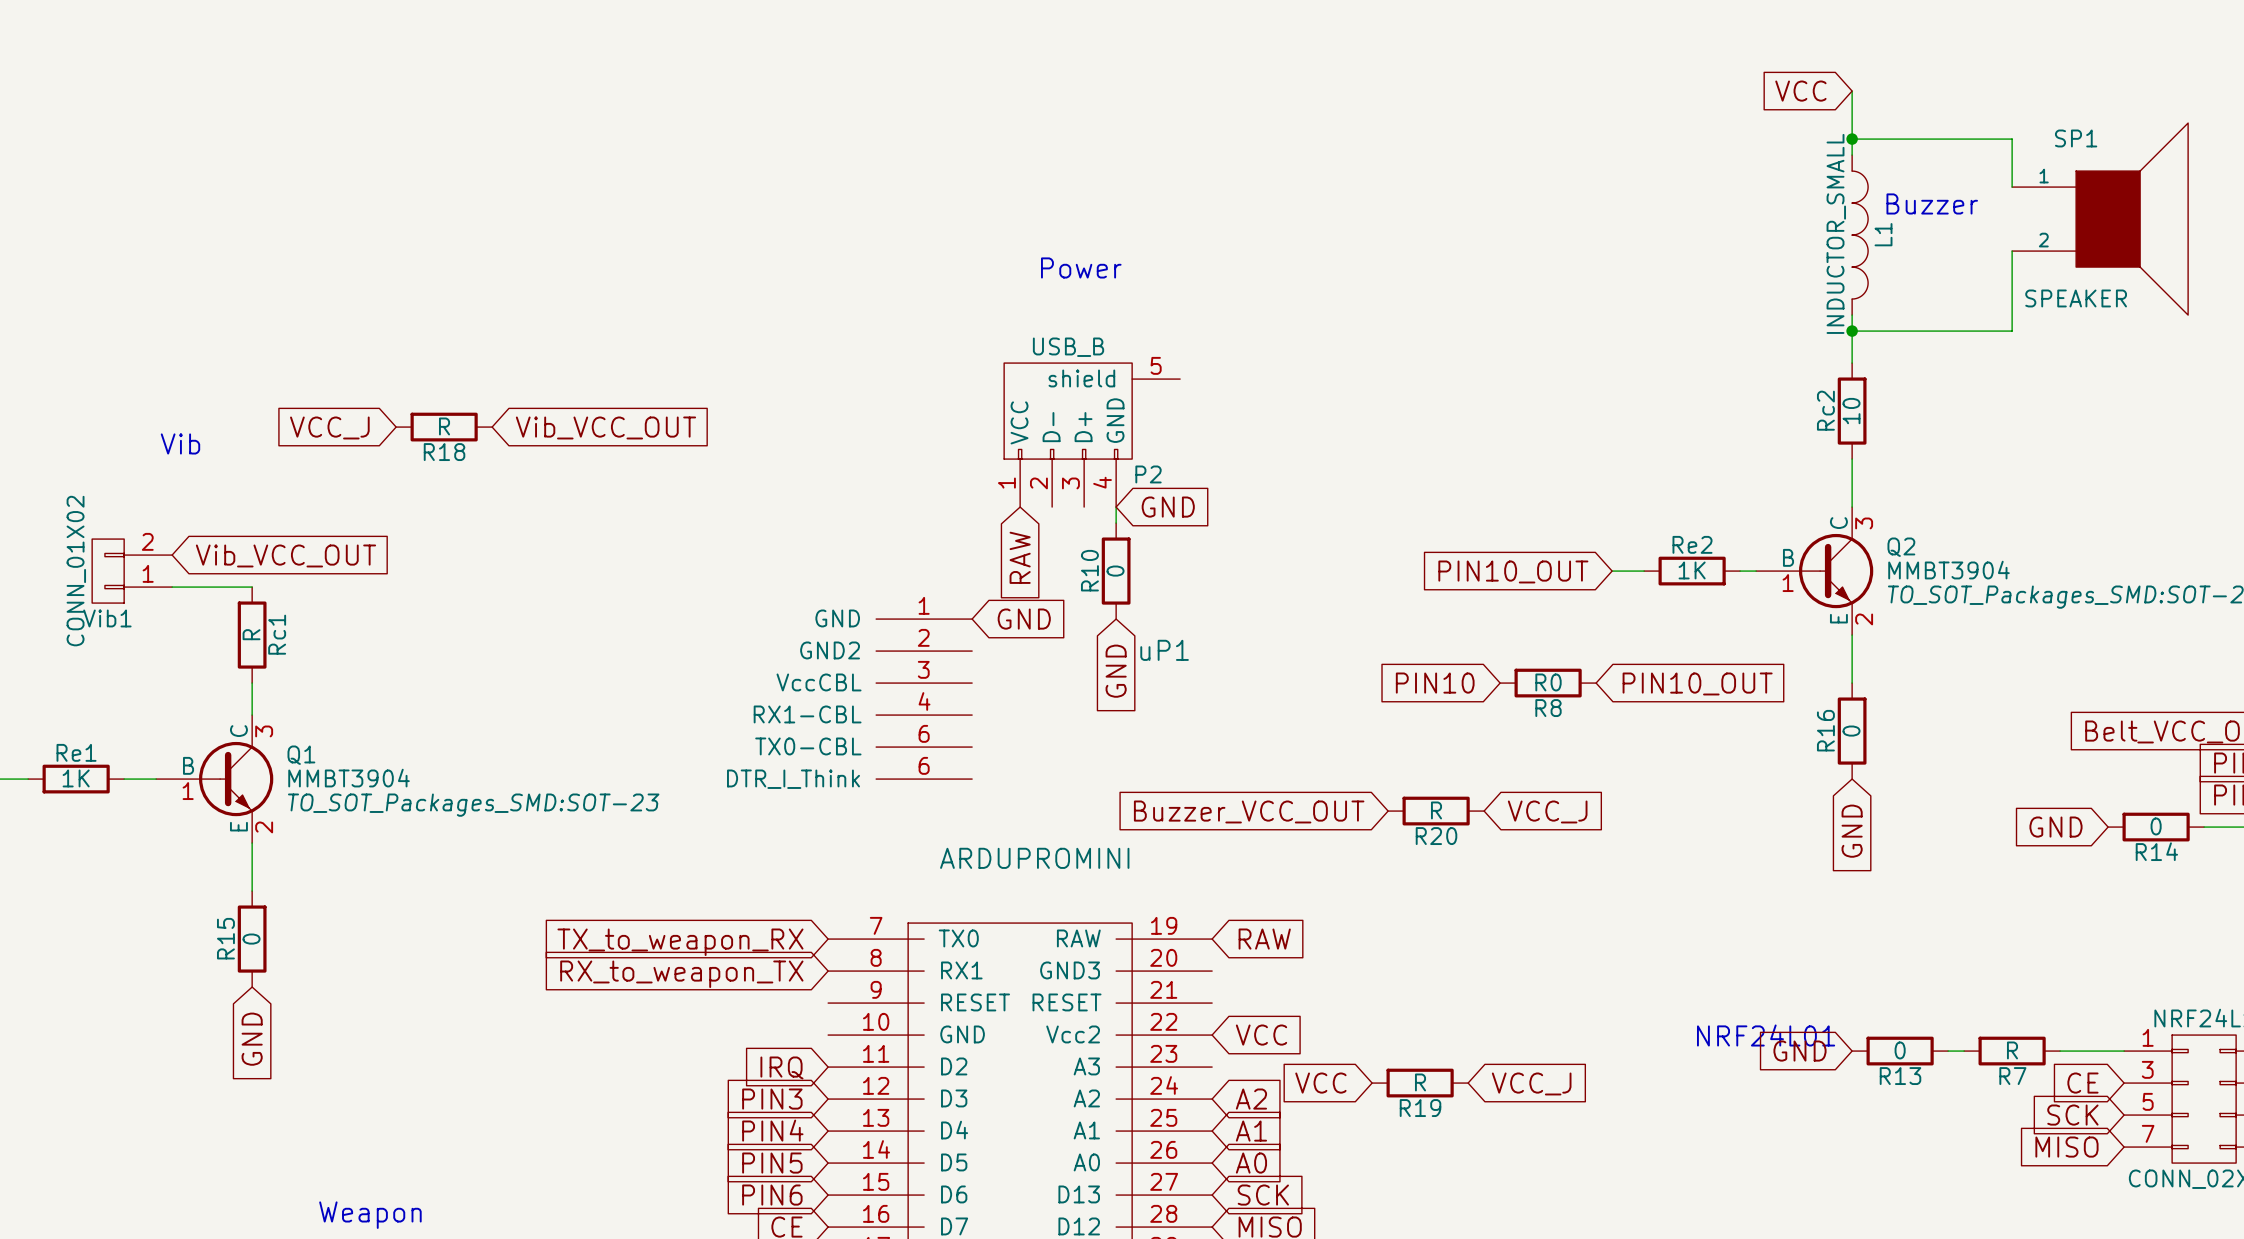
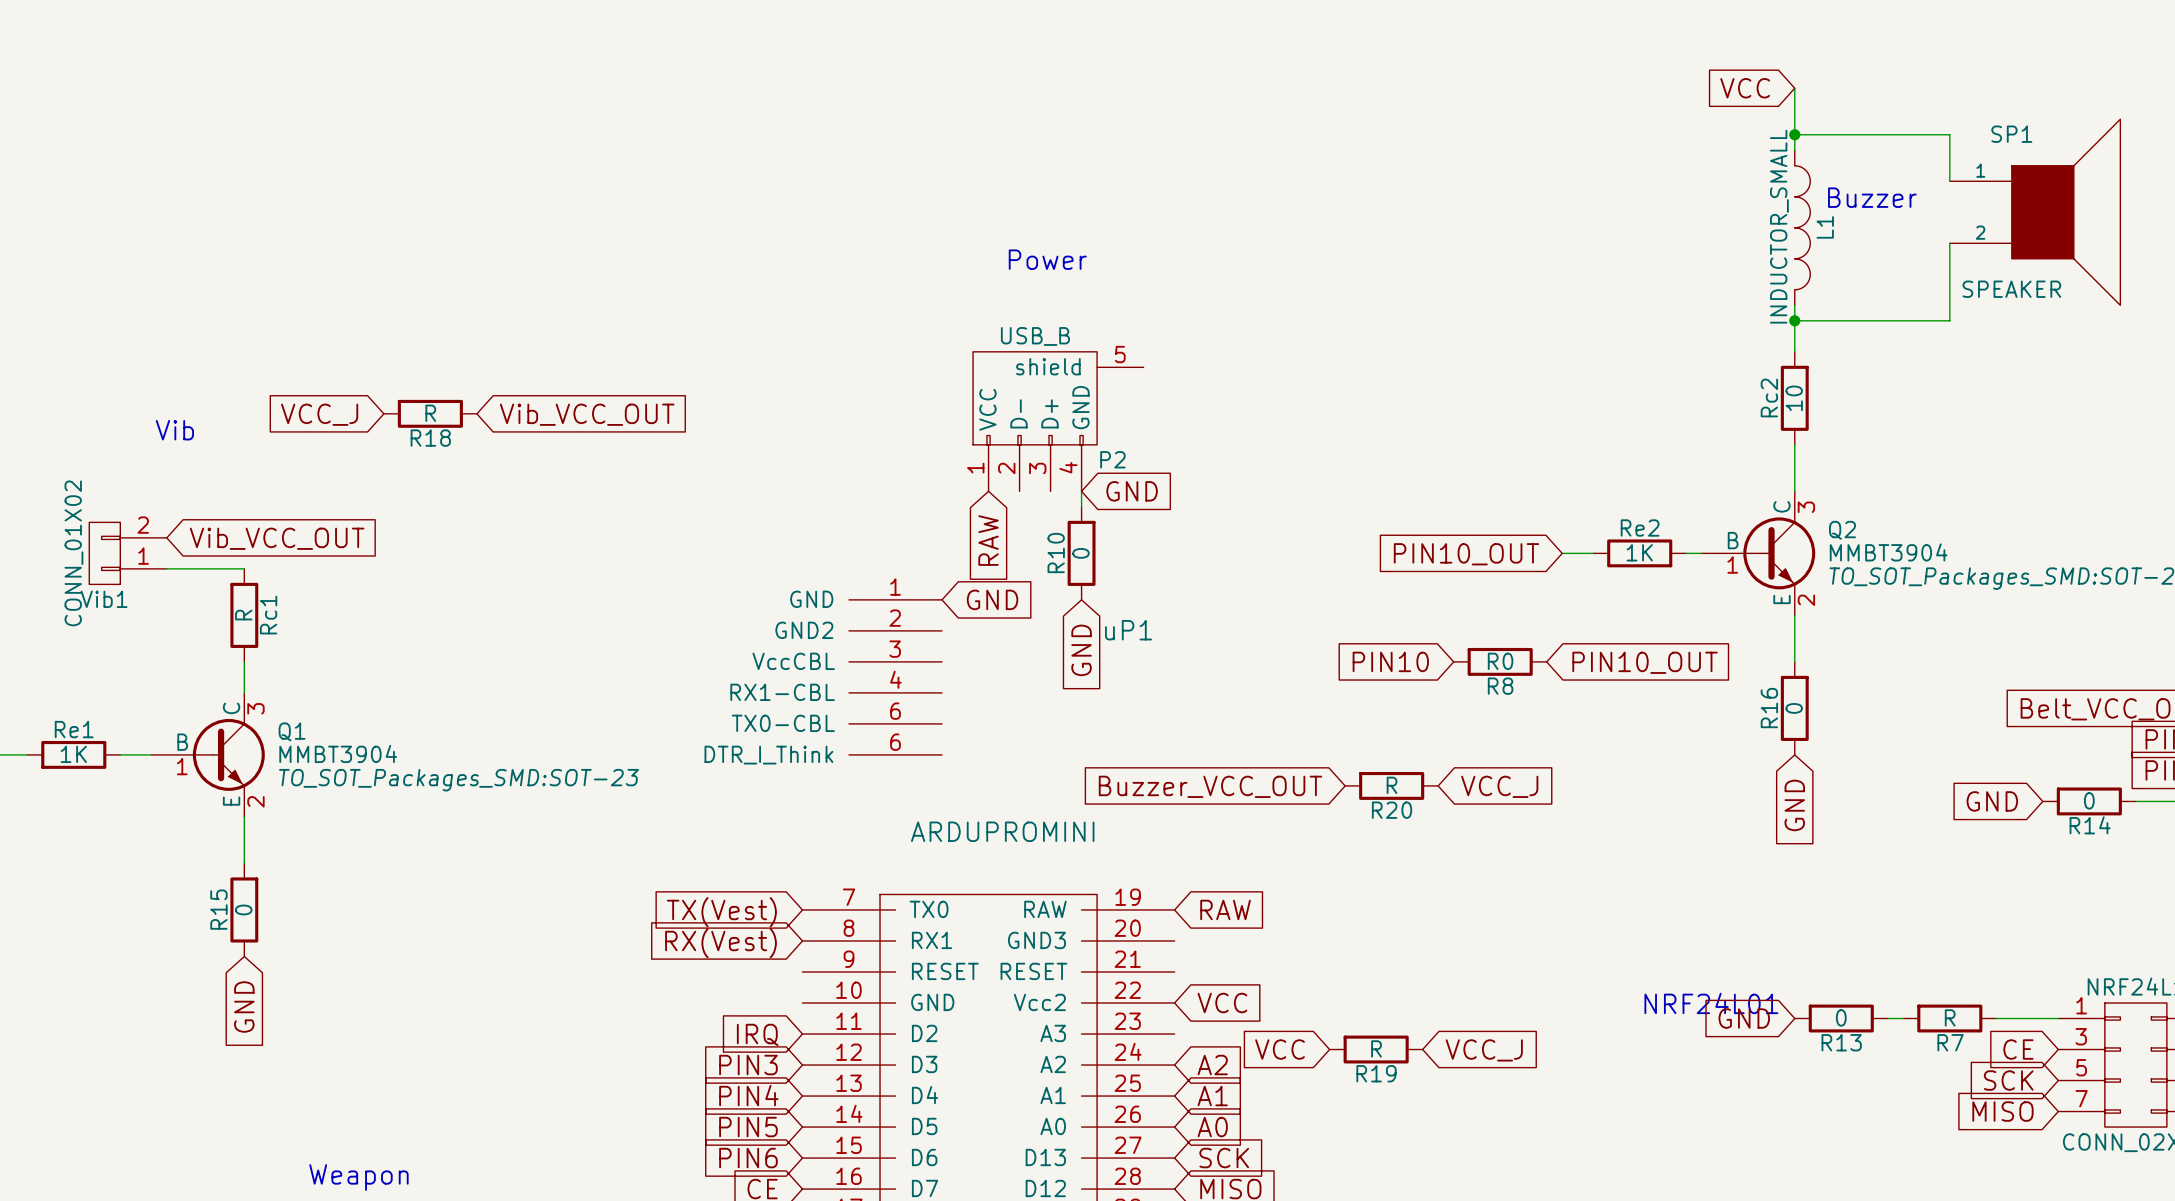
global label: TX_to_weapon_RX (680, 942) -> TX(Vest) (721, 912)
global label: RX_to_weapon_TX (681, 974) -> RX(Vest) (720, 943)

